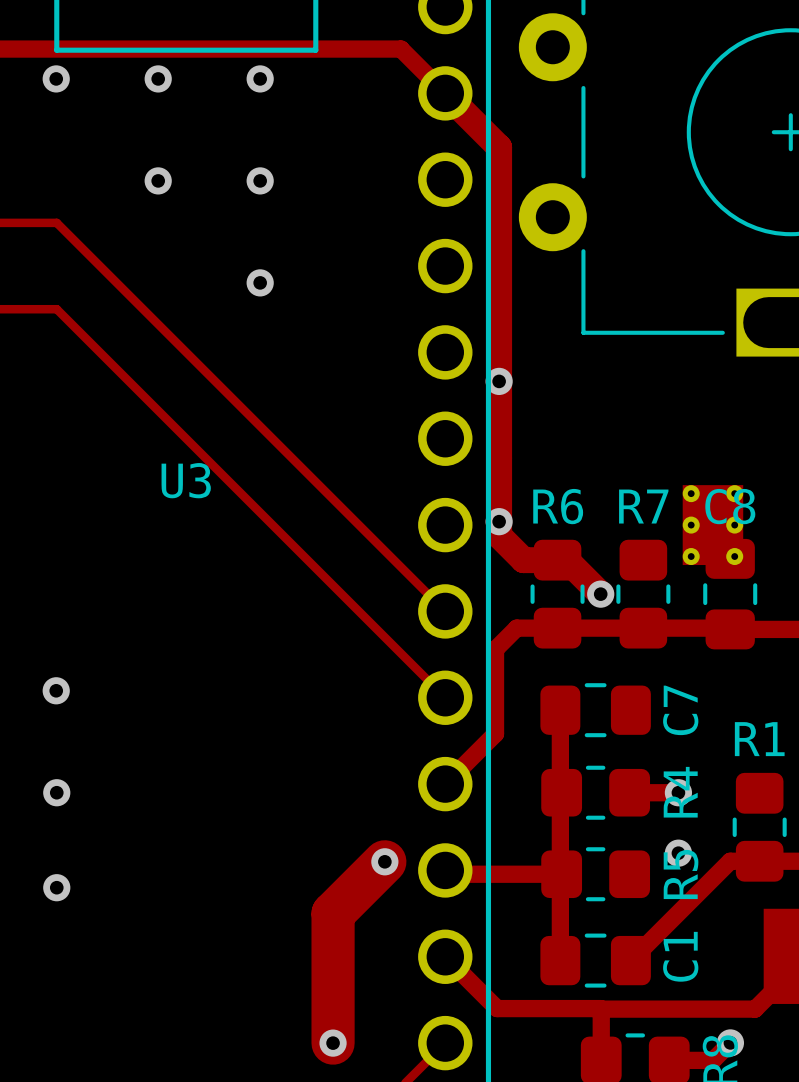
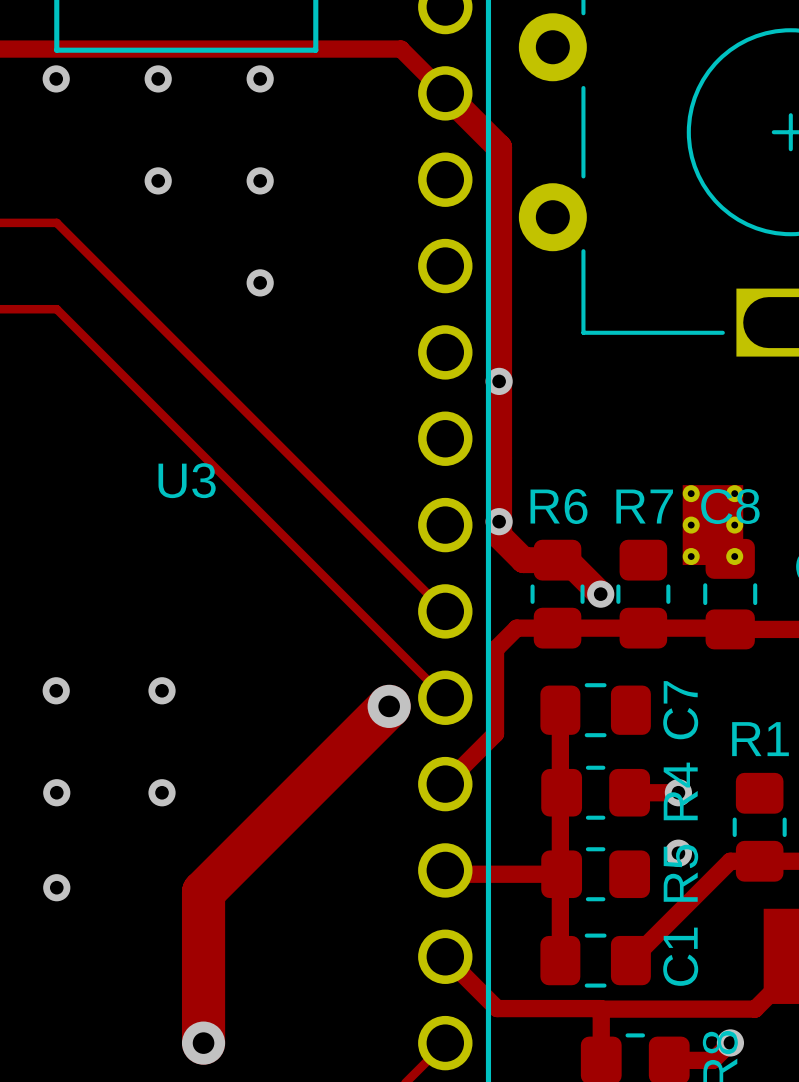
via: none -> (162, 690)
track: none -> (389, 706) (203, 892) (203, 1043)
via: none -> (389, 706)
via: none -> (162, 792)
track: (384, 861) (333, 913) (333, 1043) -> none
via: (384, 861) -> none
via: none -> (203, 1043)
via: (333, 1043) -> none

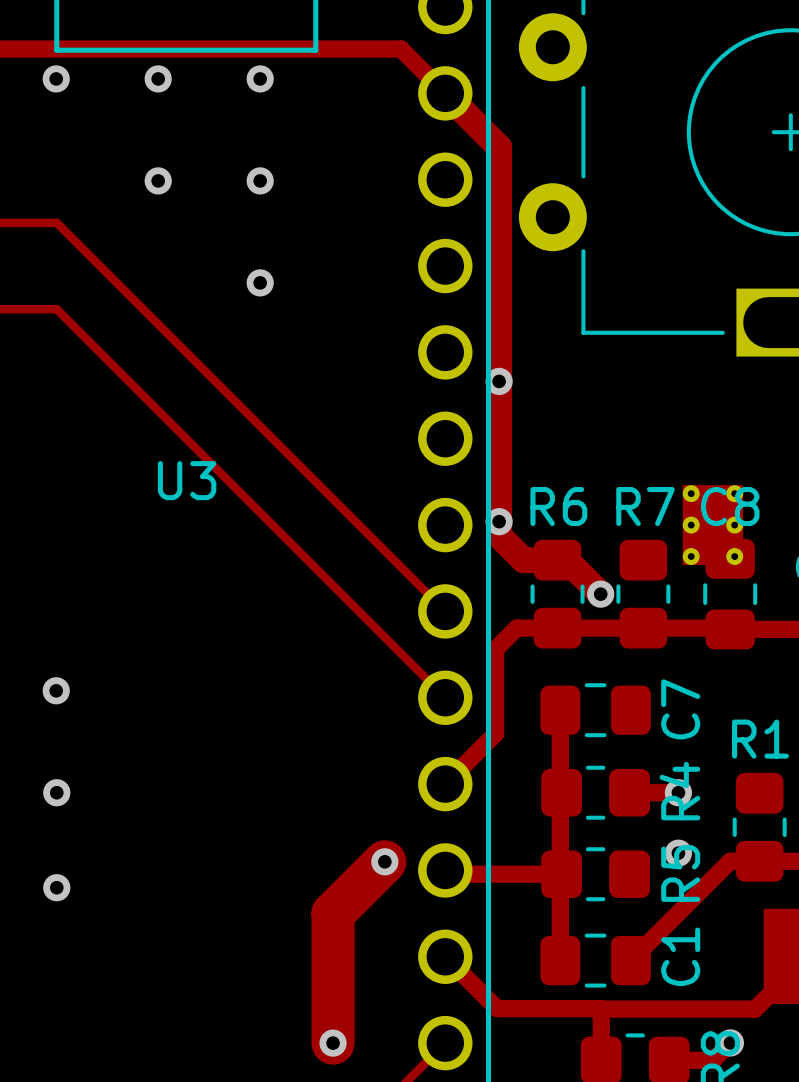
via: (162, 690) -> none
track: (389, 706) (203, 892) (203, 1043) -> none
via: (389, 706) -> none
via: (162, 792) -> none
track: none -> (384, 861) (333, 913) (333, 1043)
via: none -> (384, 861)
via: (203, 1043) -> none
via: none -> (333, 1043)

